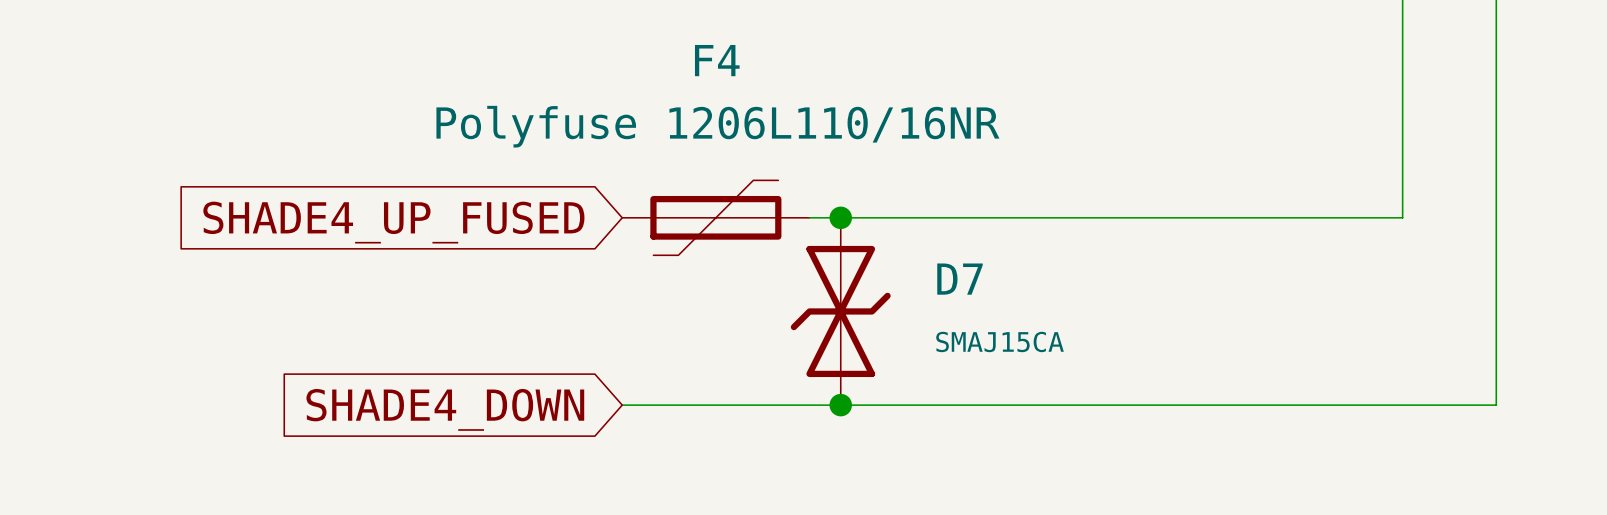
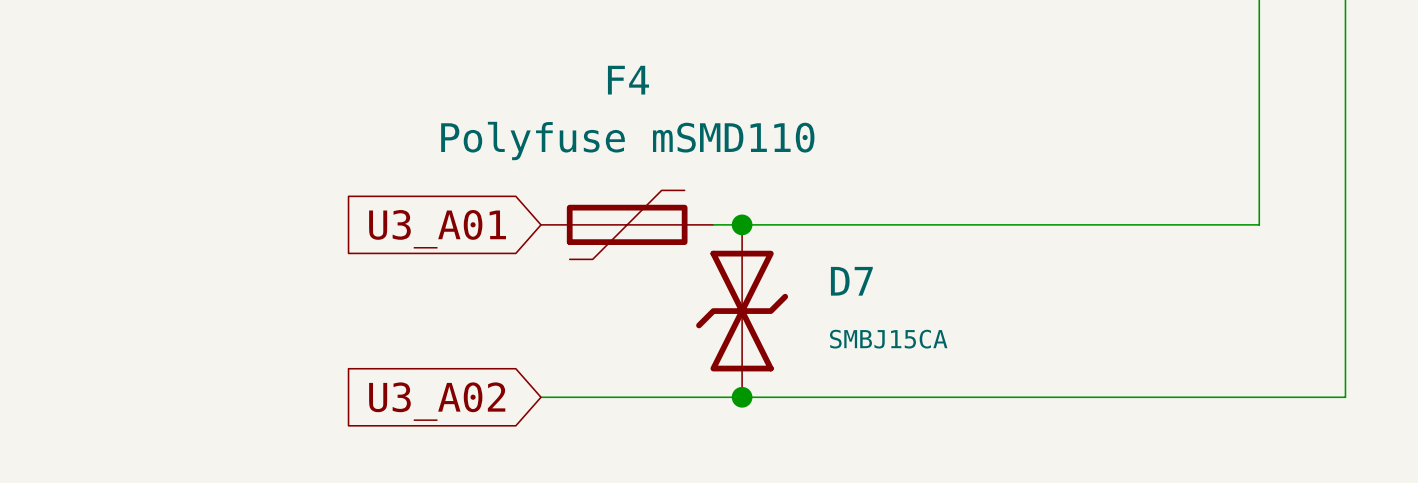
F4 value: Polyfuse 1206L110/16NR (717, 126) -> Polyfuse mSMD110 (627, 141)
global label: SHADE4_UP_FUSED (393, 222) -> U3_A01 (437, 229)
D7 value: SMAJ15CA (1000, 341) -> SMBJ15CA (888, 339)
global label: SHADE4_DOWN (445, 409) -> U3_A02 (437, 401)

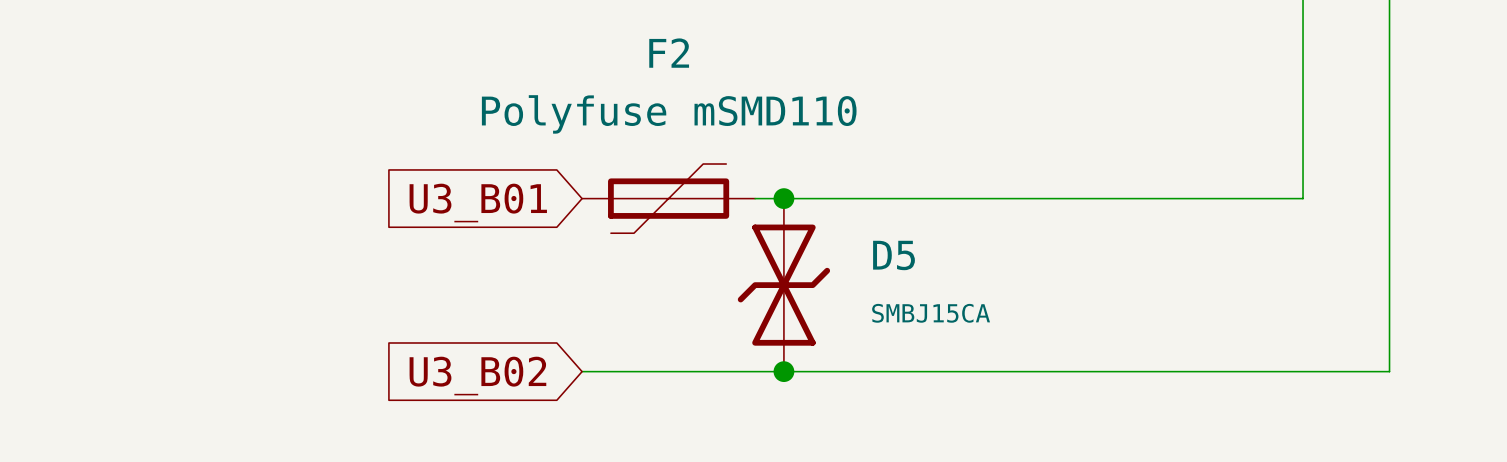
F4 name: F4 (628, 80) -> F2 (669, 53)
global label: U3_A01 (437, 229) -> U3_B01 (478, 203)
D7 name: D7 (851, 281) -> D5 (894, 255)
global label: U3_A02 (437, 401) -> U3_B02 (477, 376)

